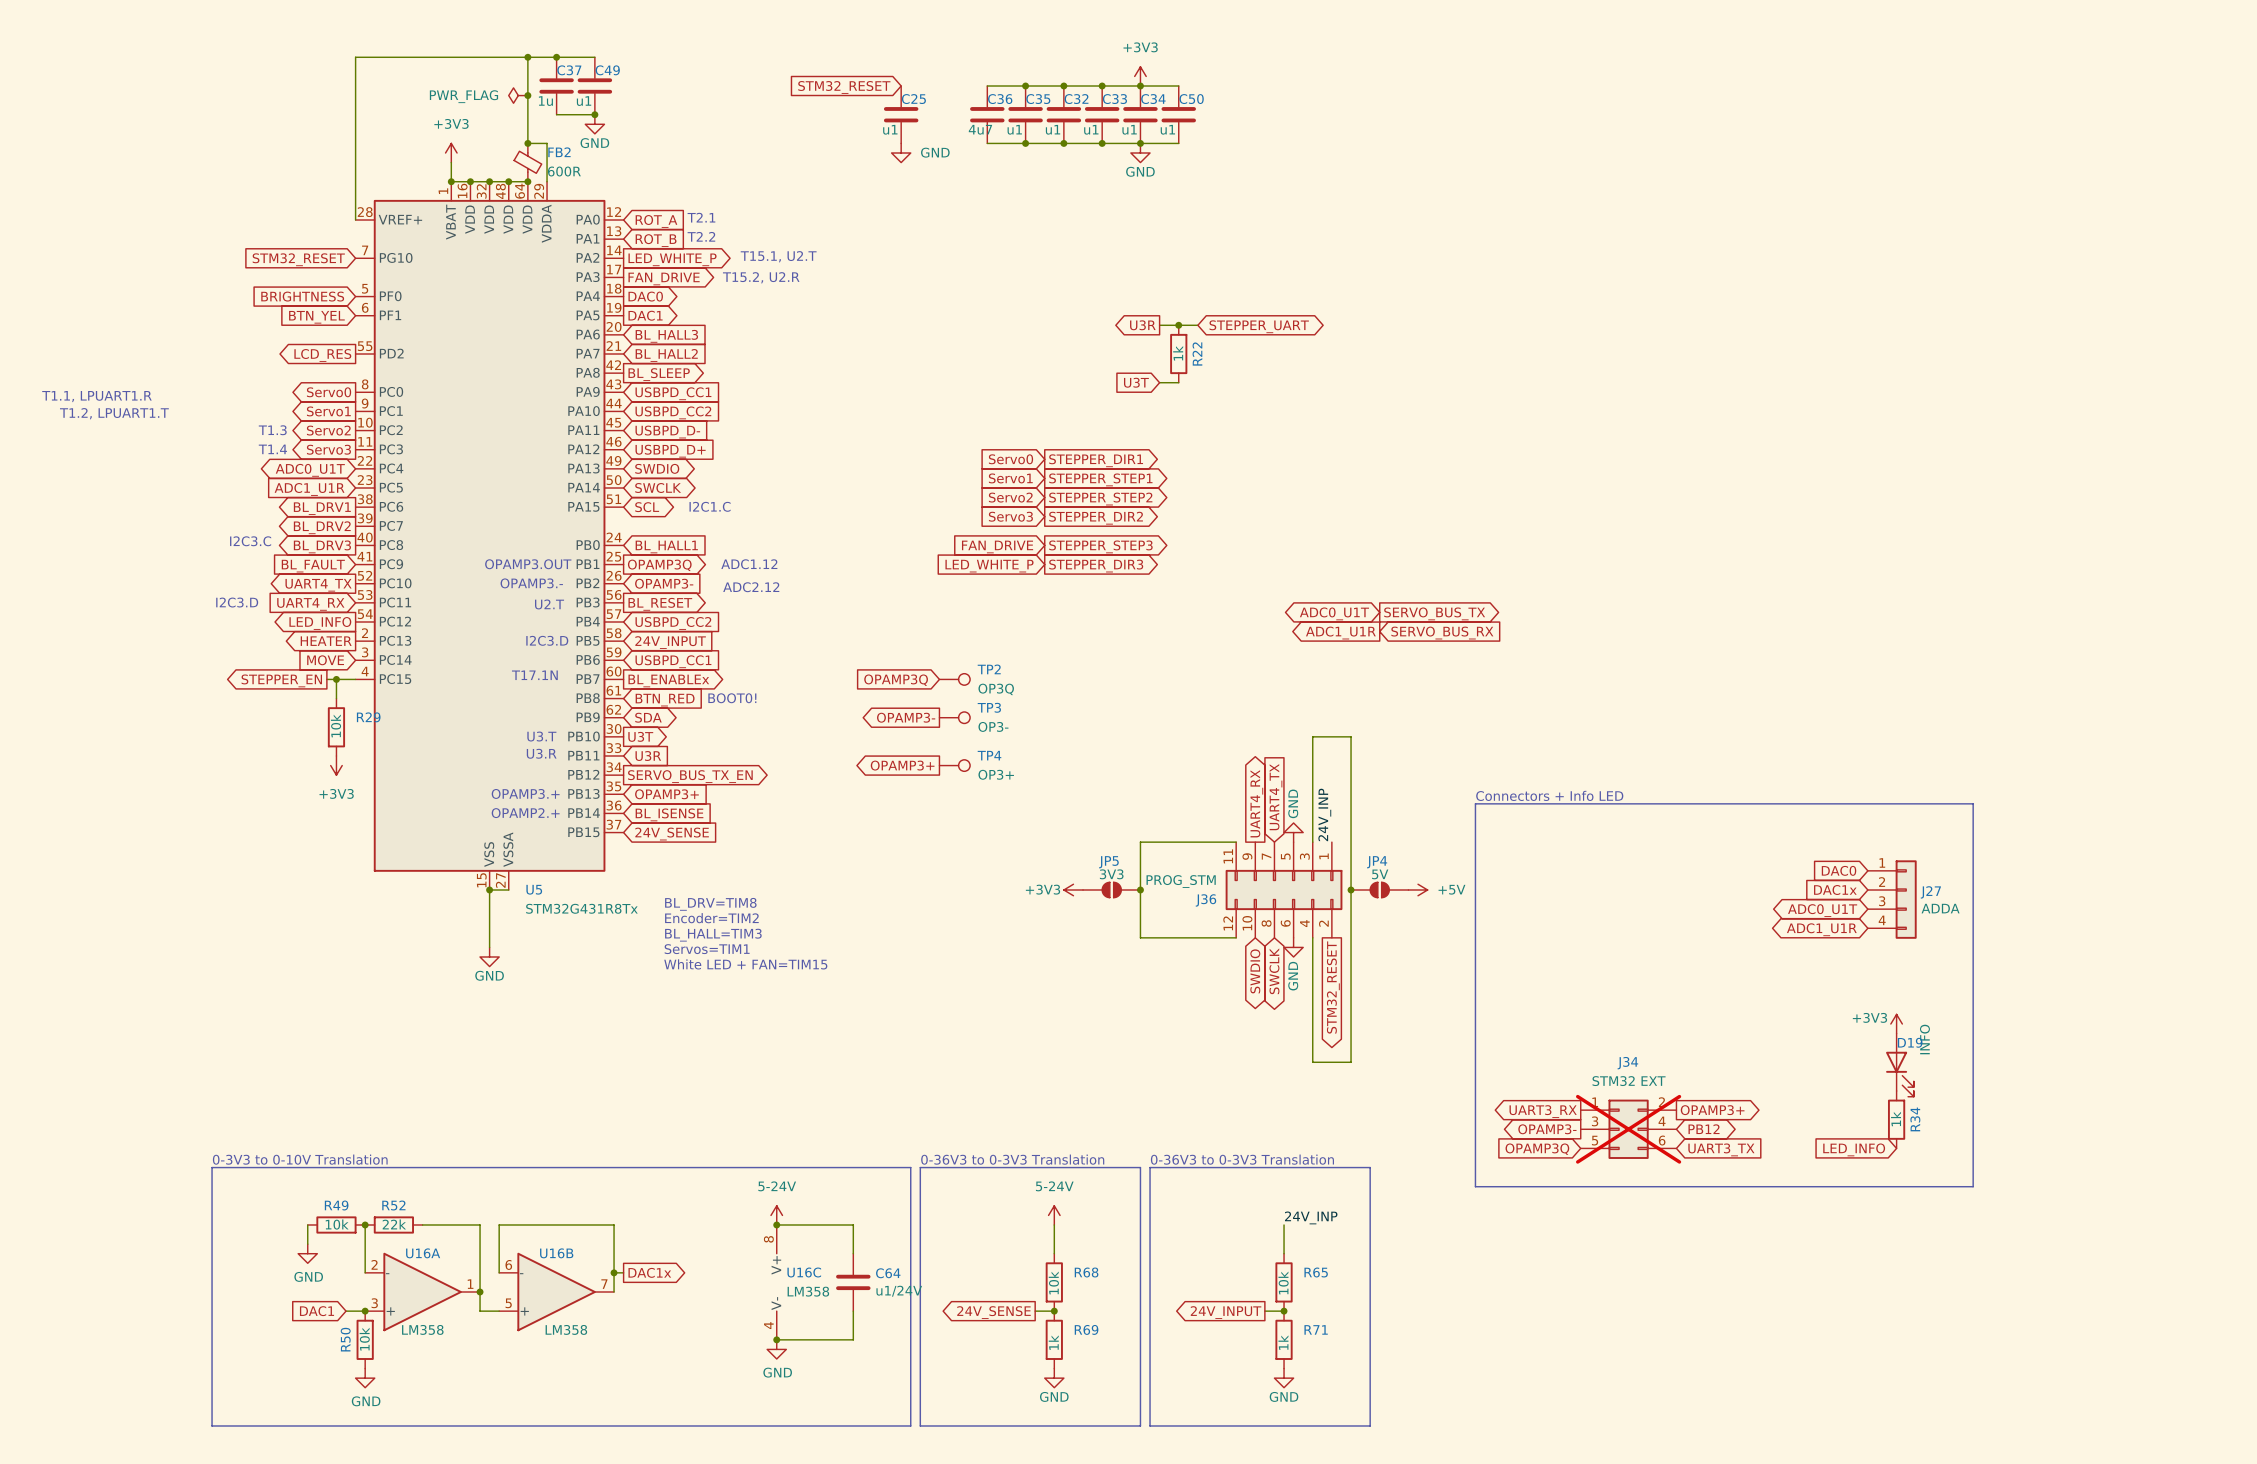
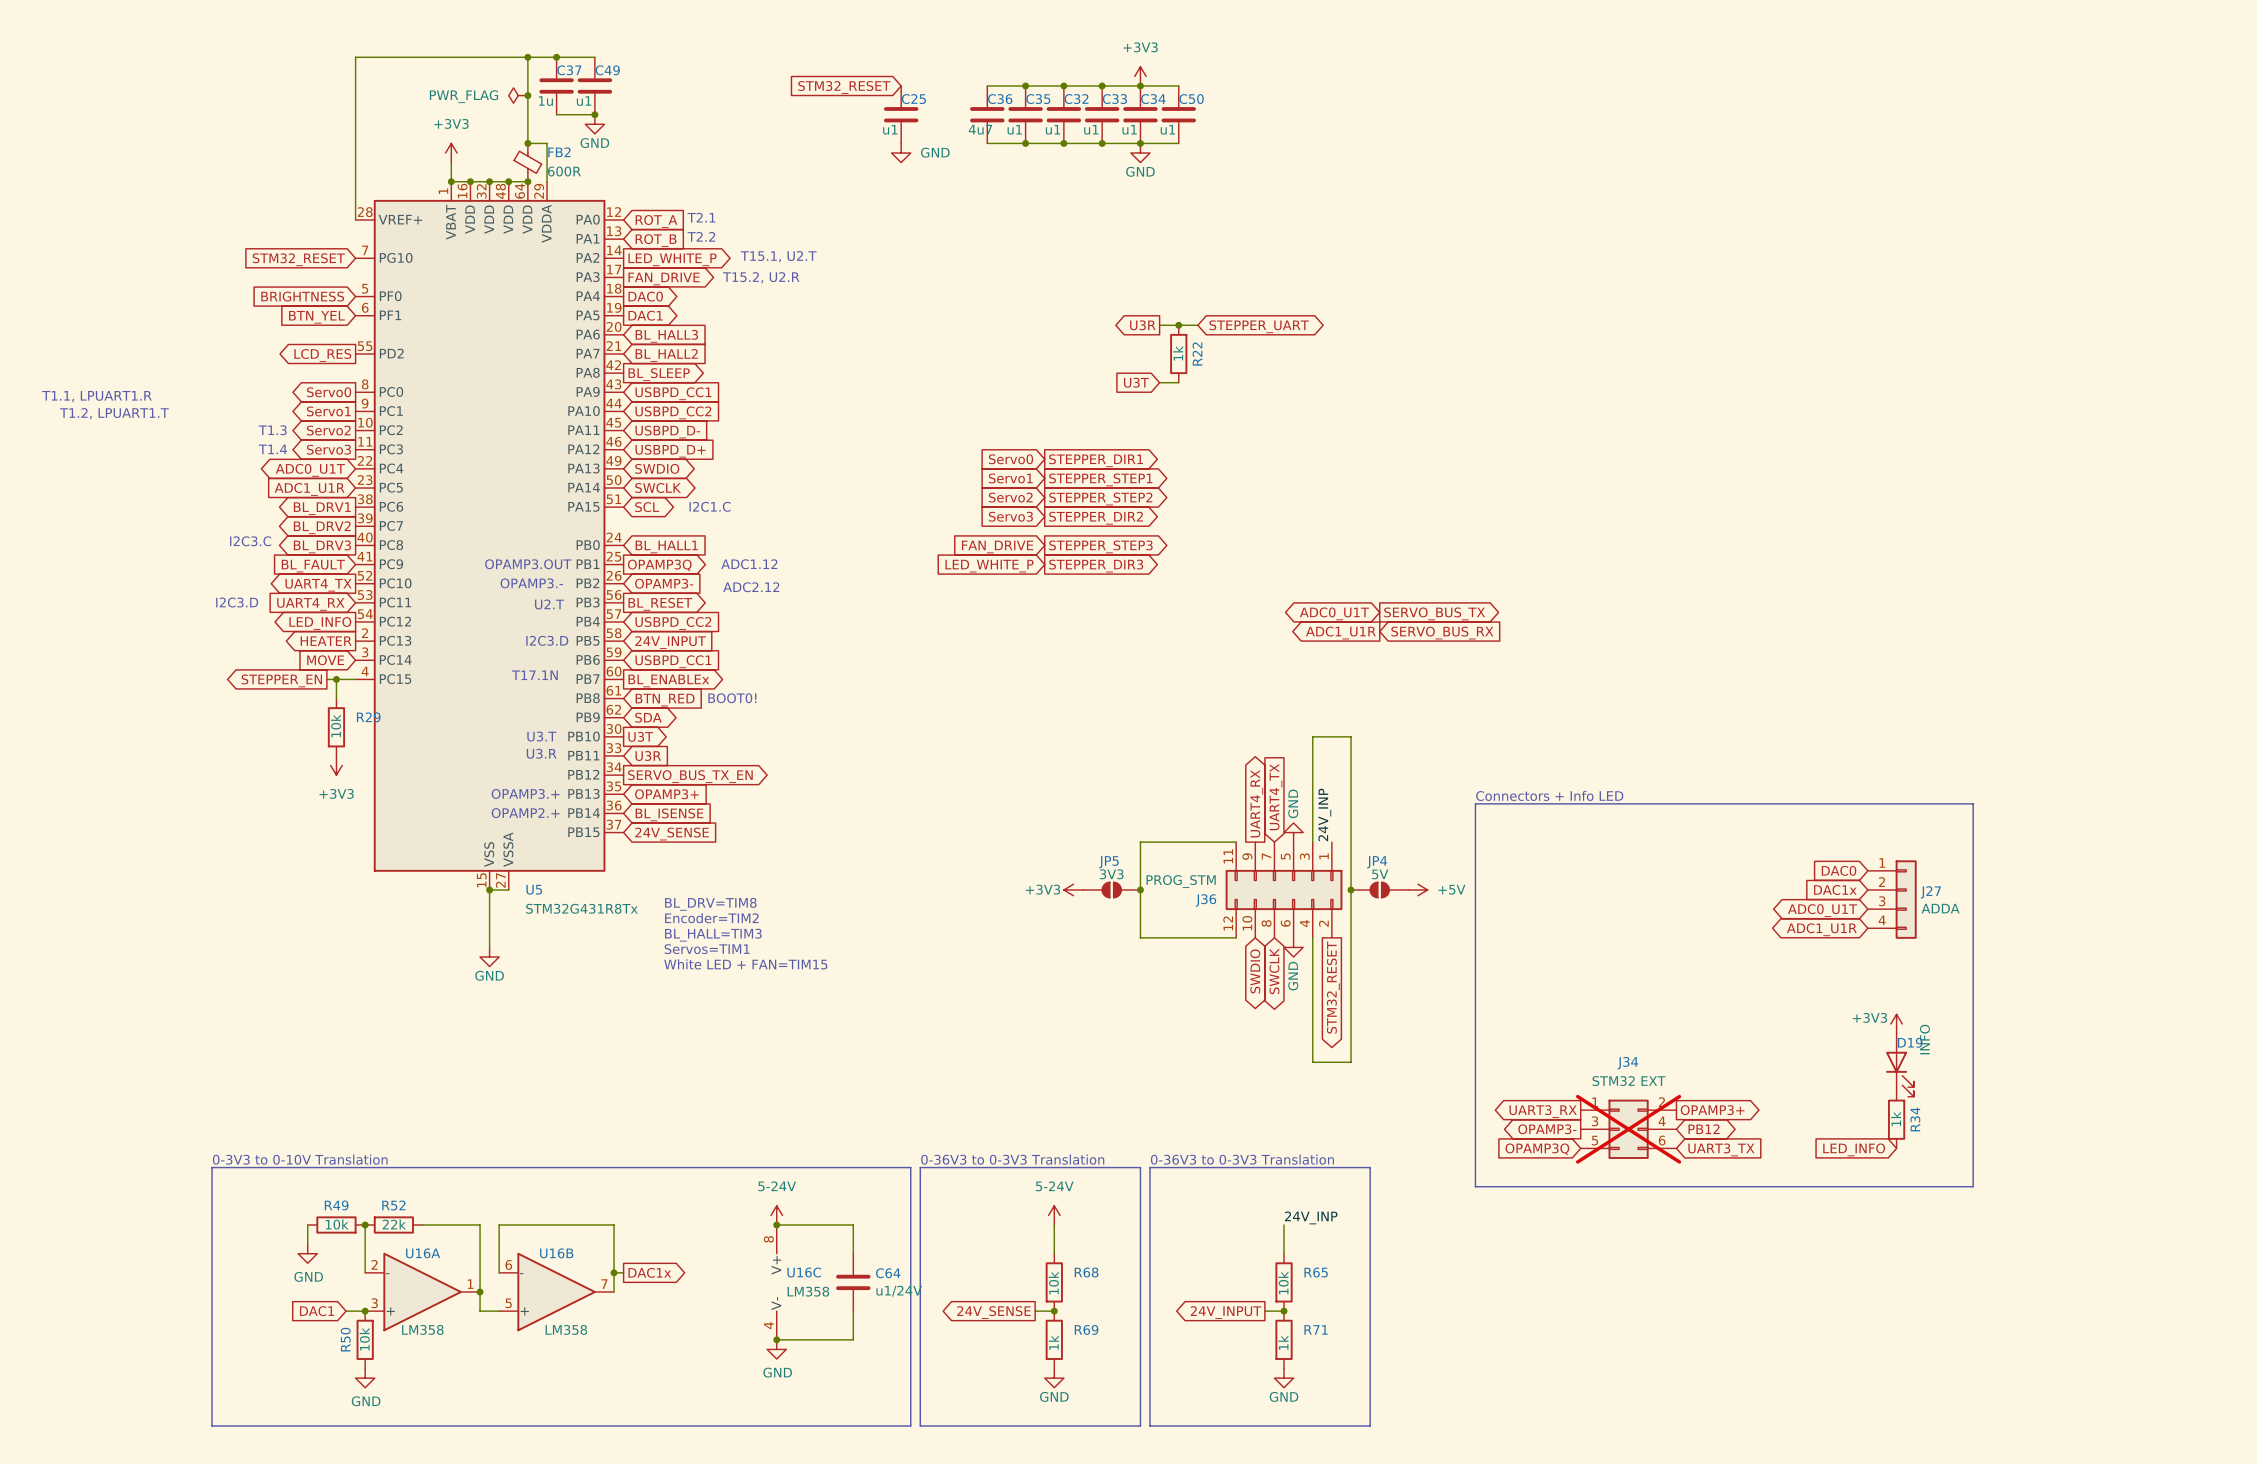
TP2: OP3Q (954, 679) -> none
global label: OPAMP3Q (896, 680) -> none
global label: OPAMP3- (906, 717) -> none
TP3: OP3- (954, 717) -> none
global label: OPAMP3+ (902, 765) -> none
TP4: OP3+ (954, 765) -> none

